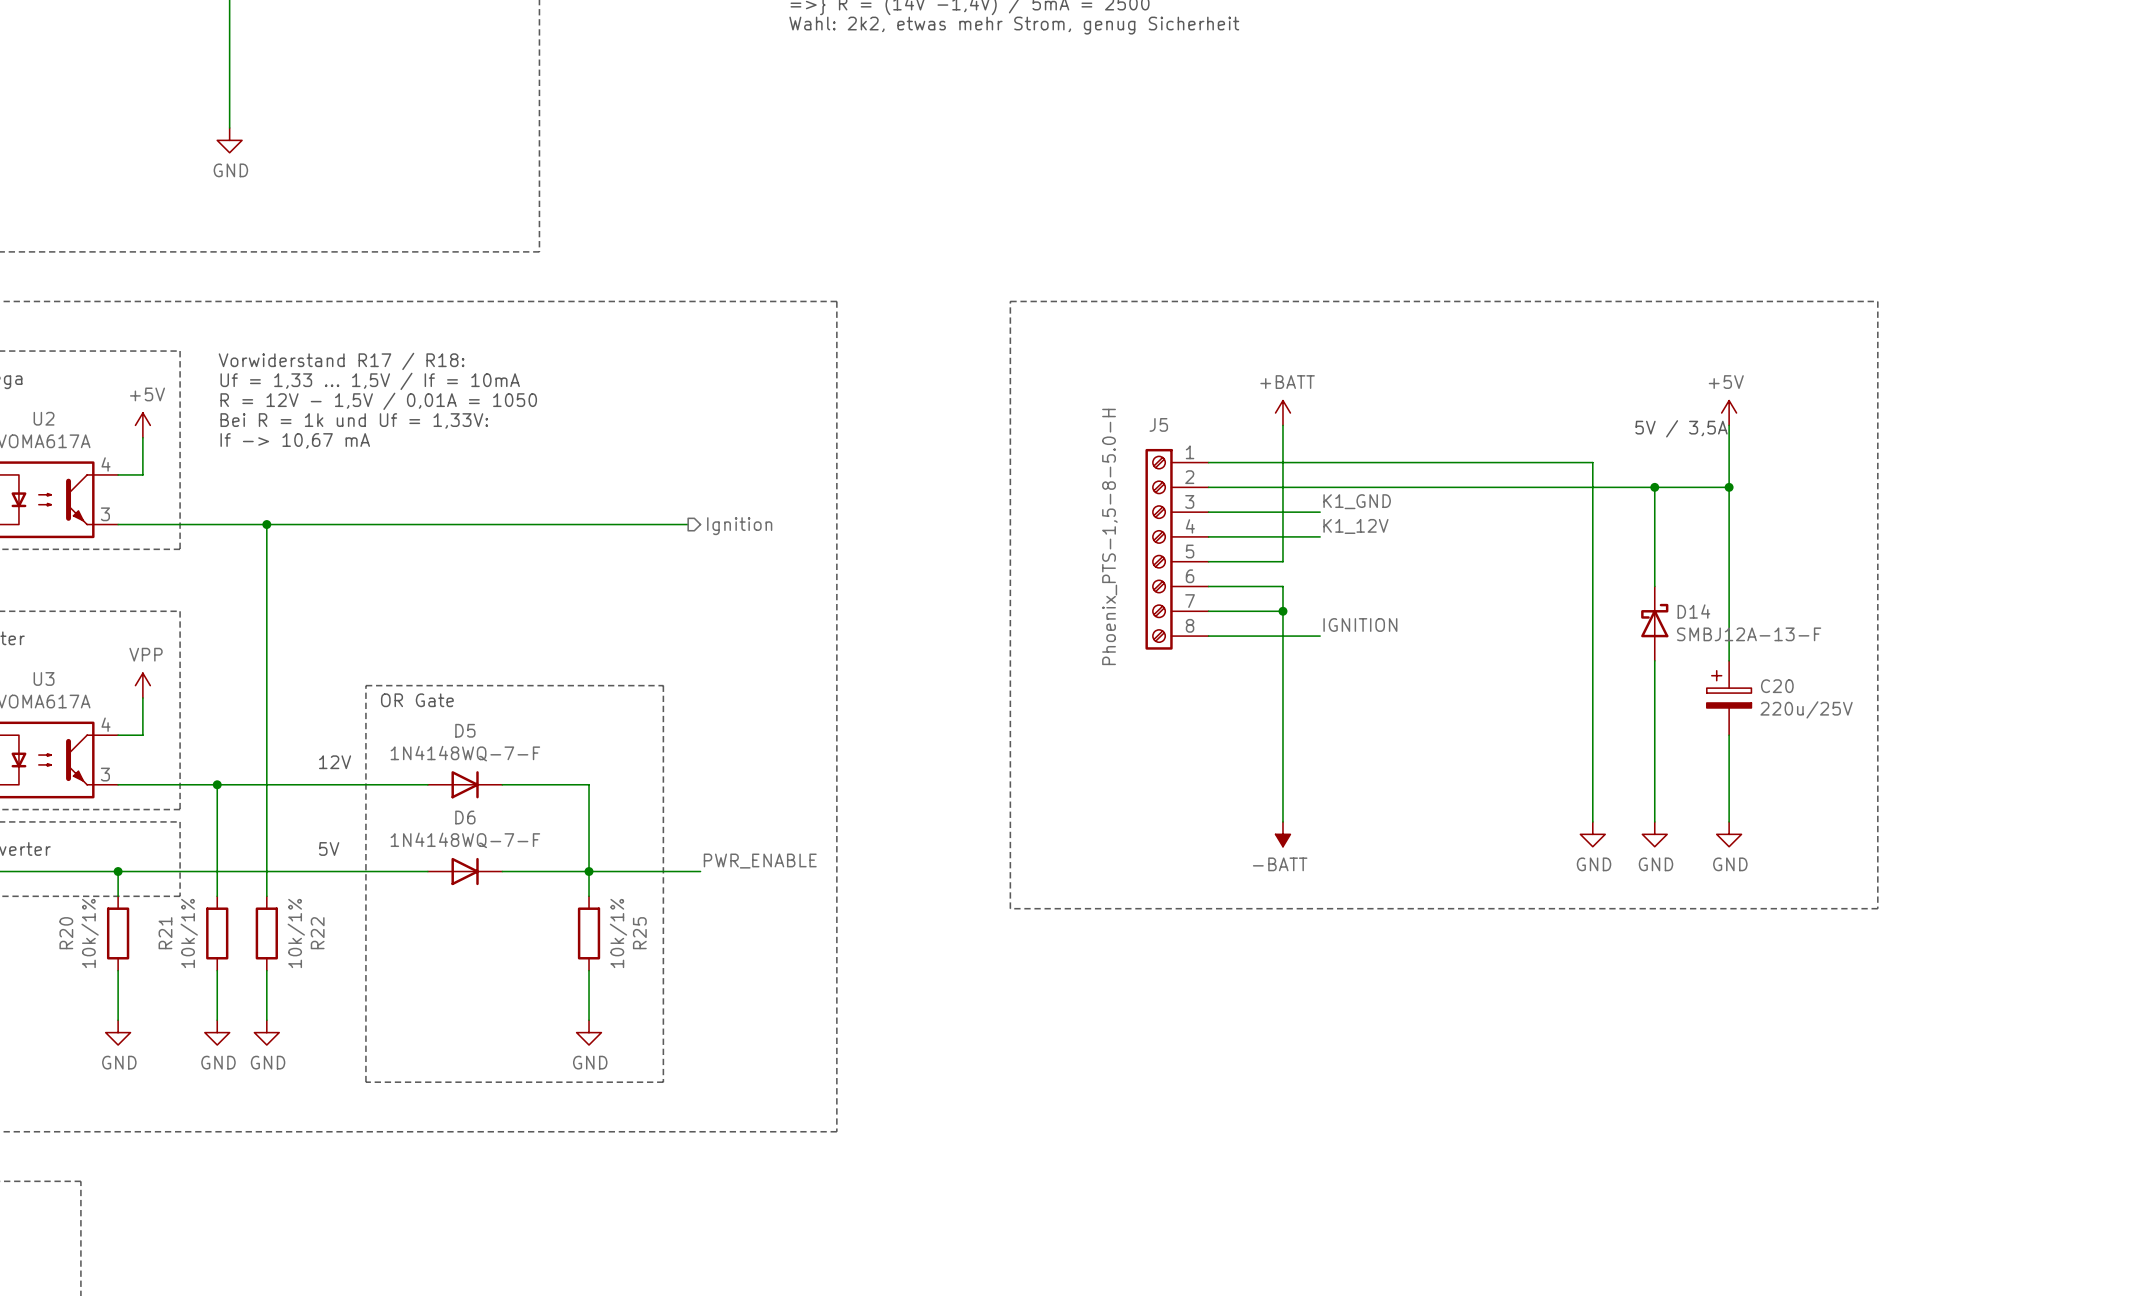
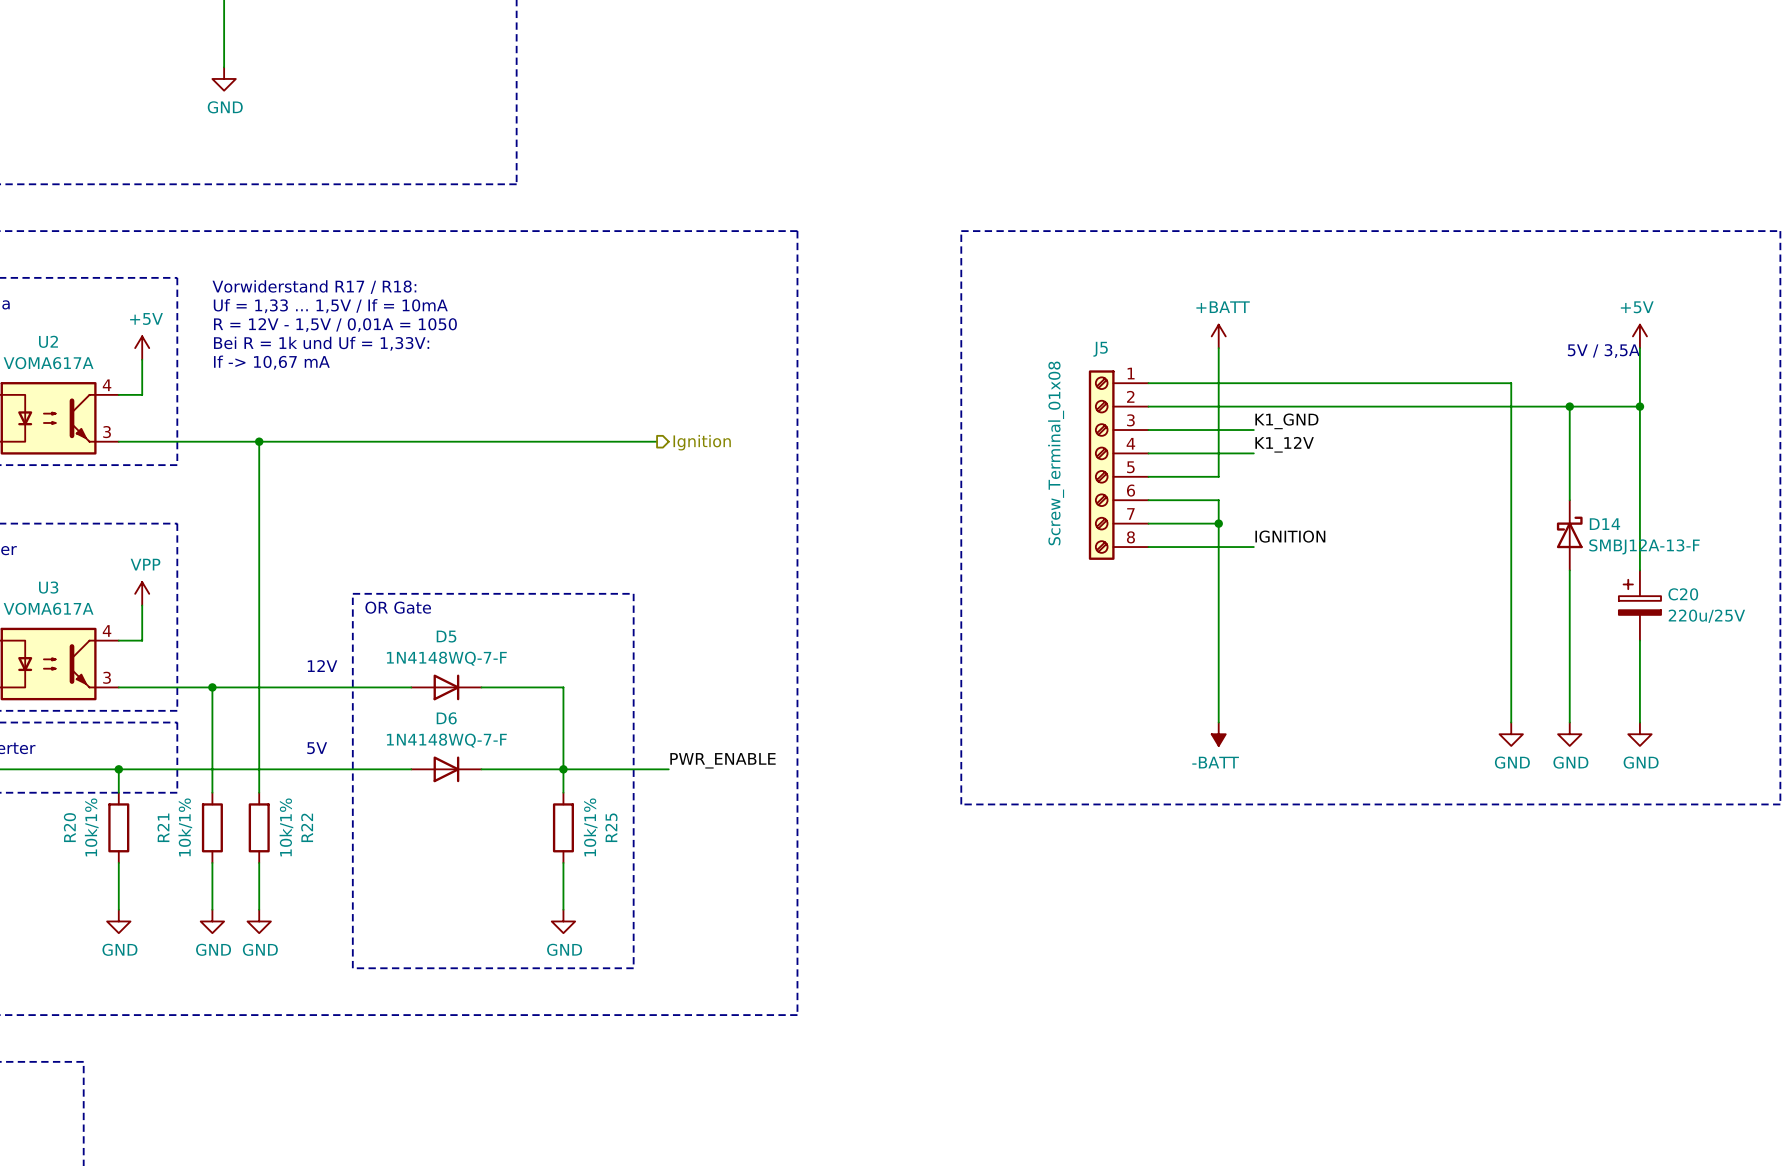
J5 value: Phoenix_PTS-1,5-8-5.0-H (1109, 536) -> Screw_Terminal_01x08 (1056, 453)

